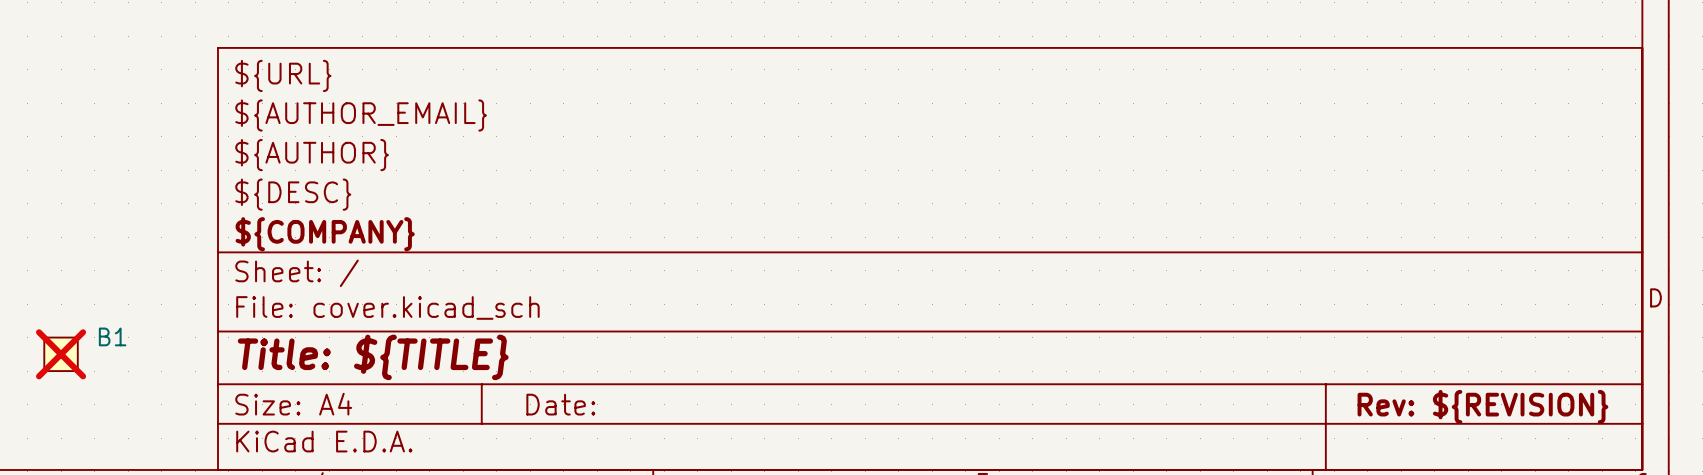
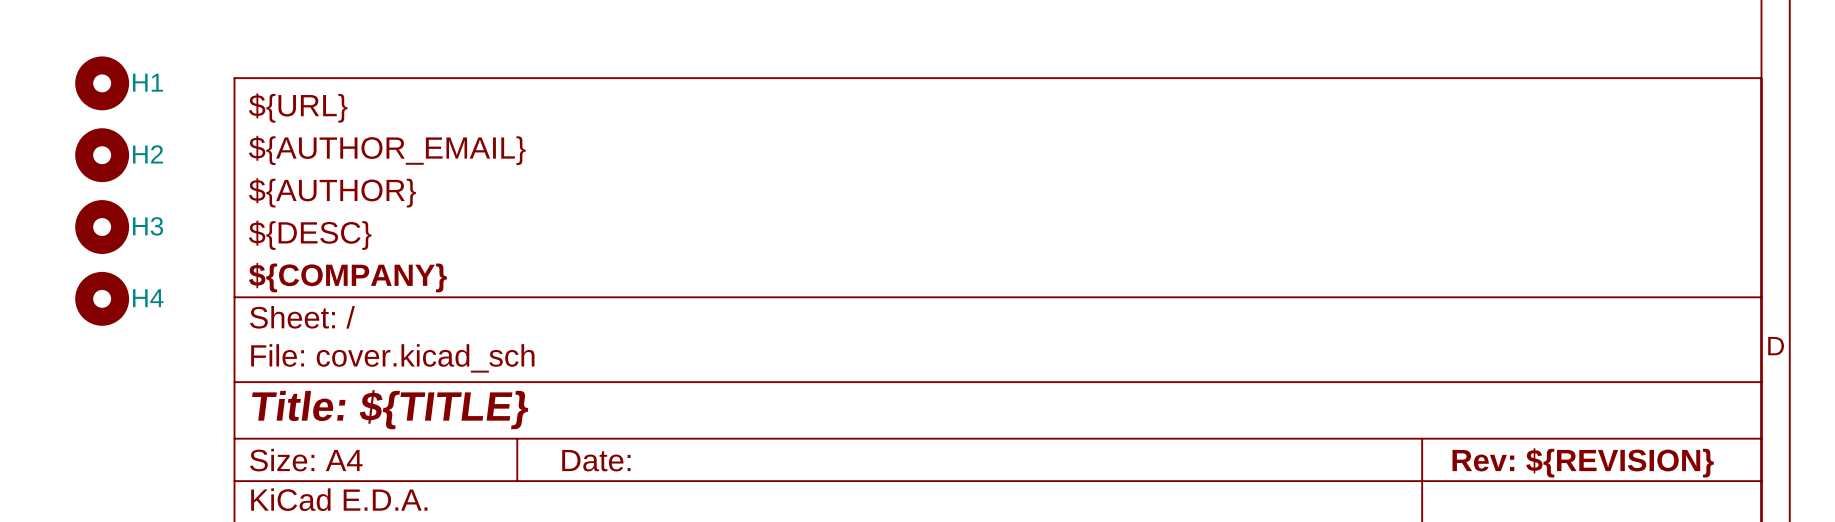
H1: none -> (102, 83)
H2: none -> (102, 155)
H3: none -> (102, 227)
H4: none -> (102, 298)
B1: (61, 354) -> none

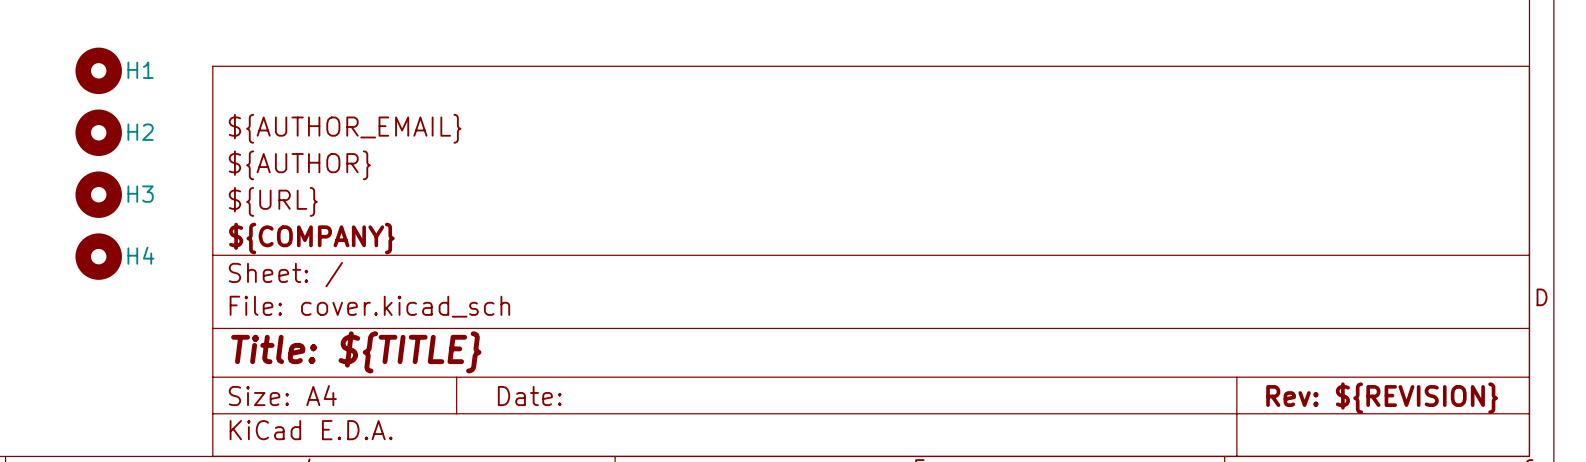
title block: ${URL} (298, 108) -> none
title block: ${DESC} (310, 235) -> ${URL} (273, 201)

